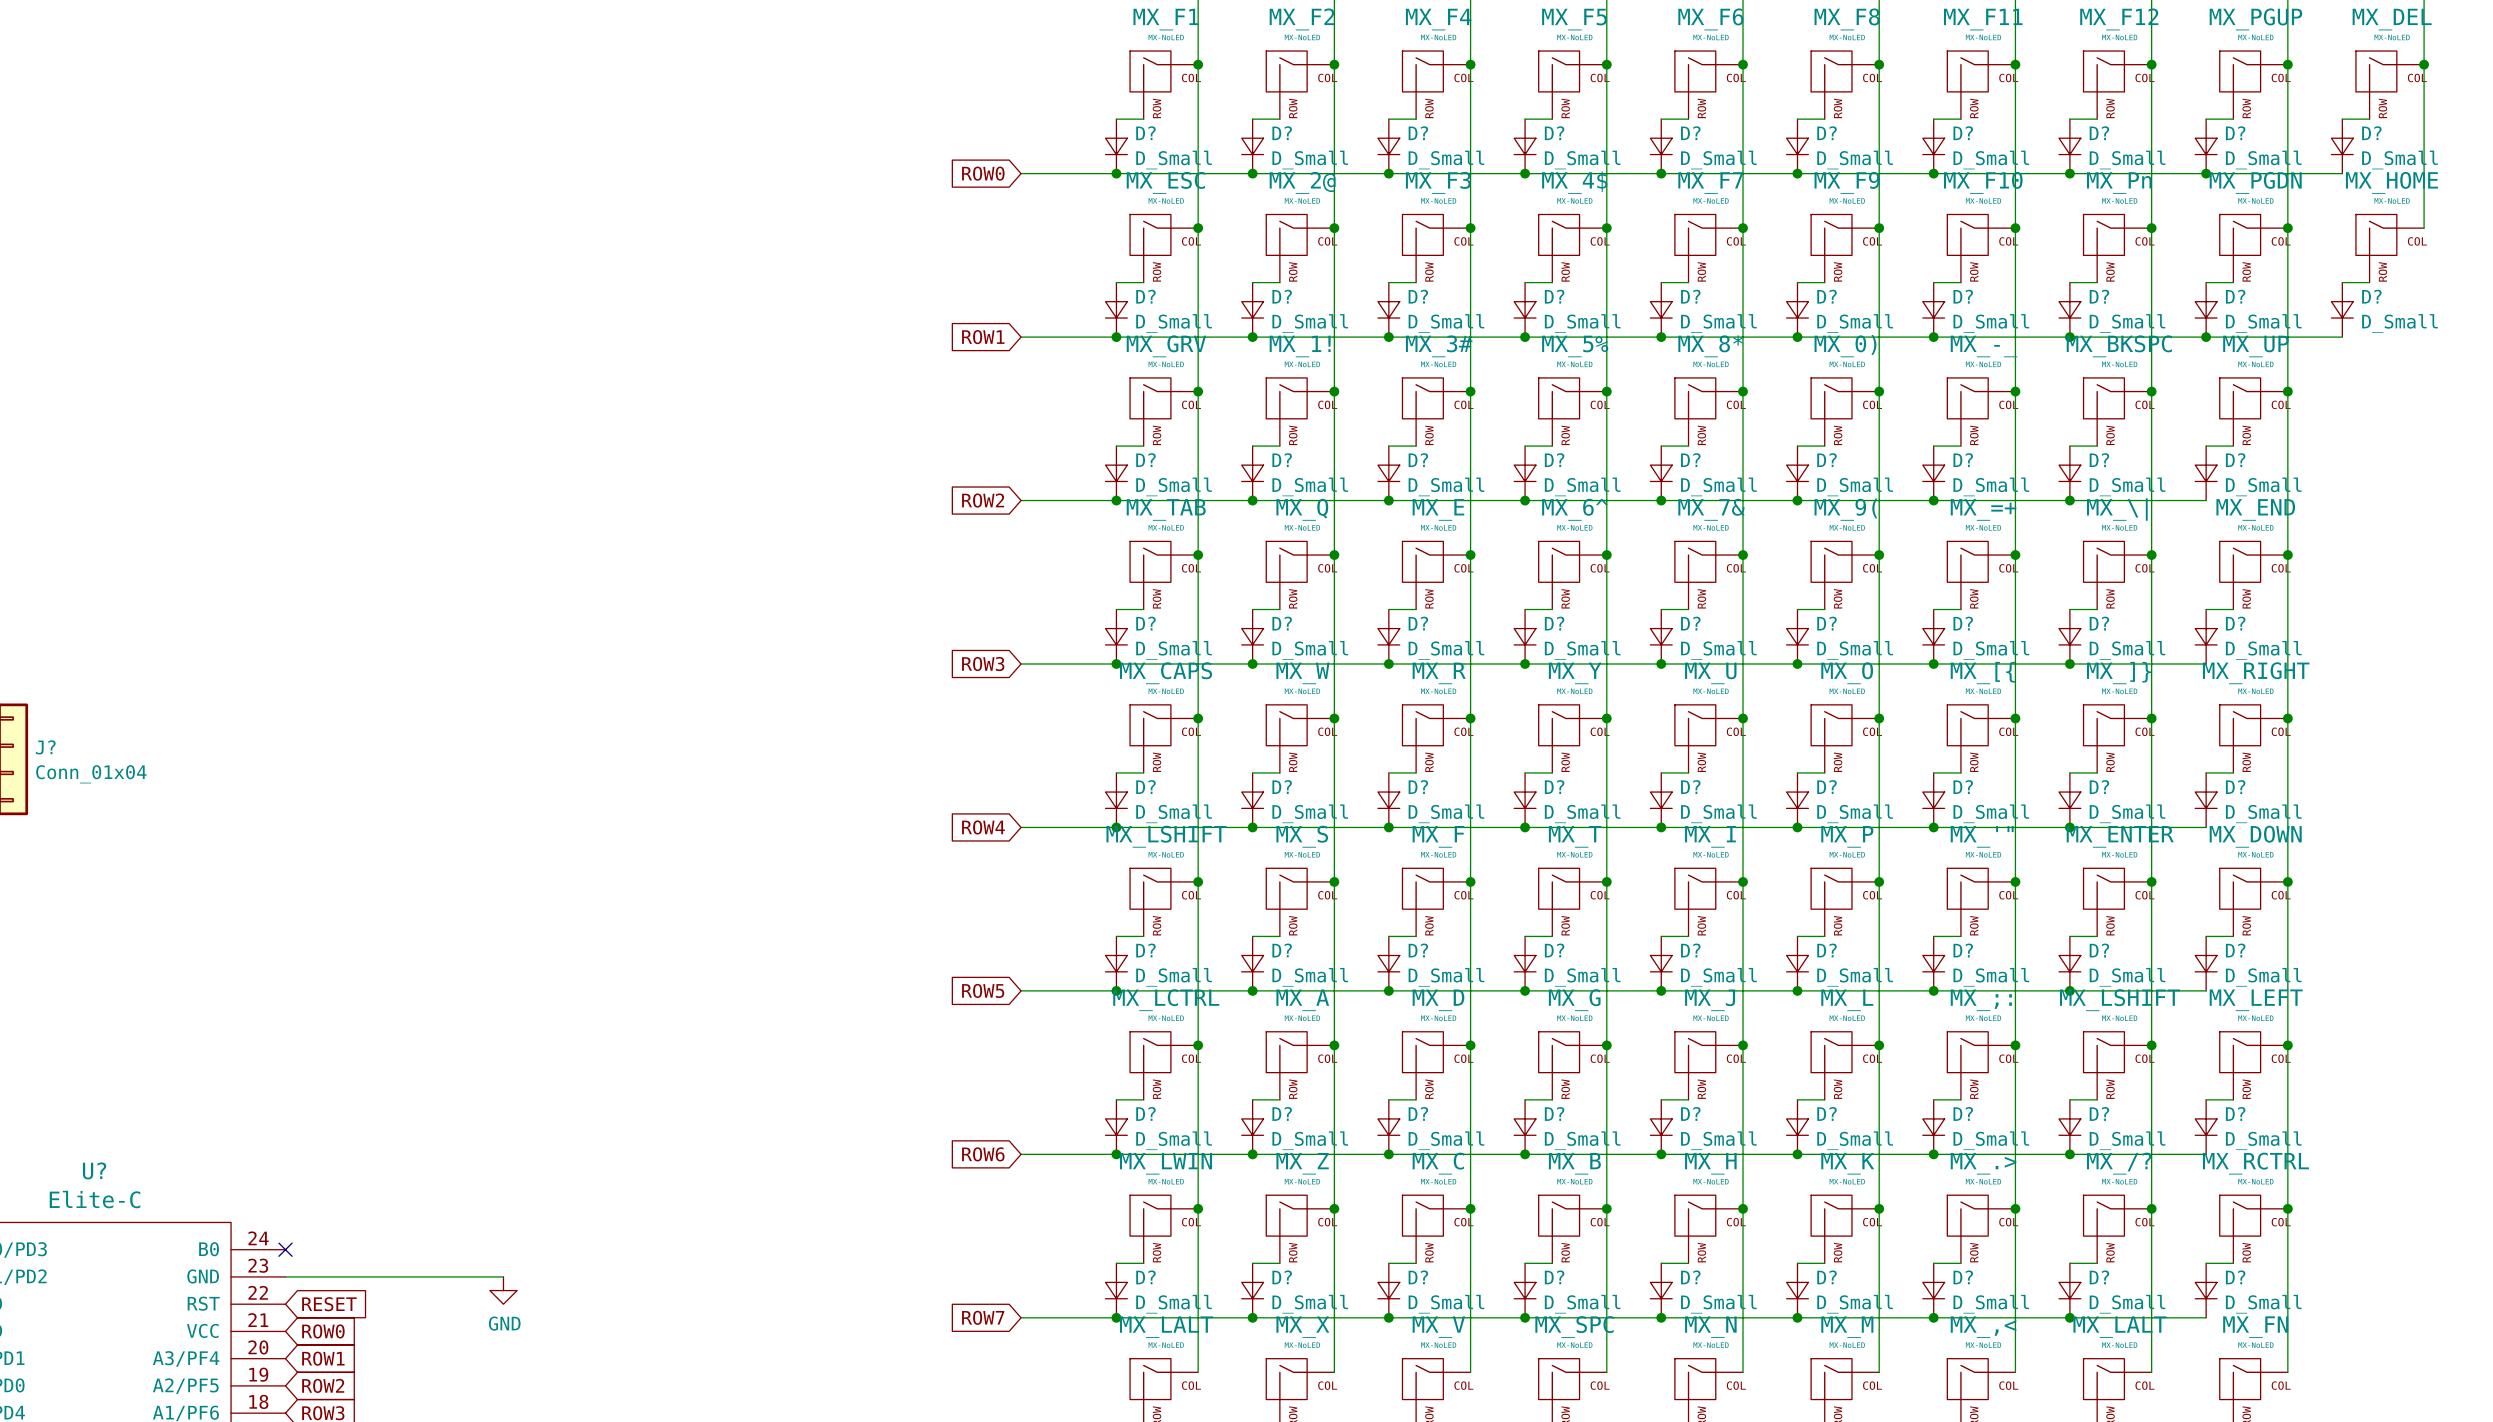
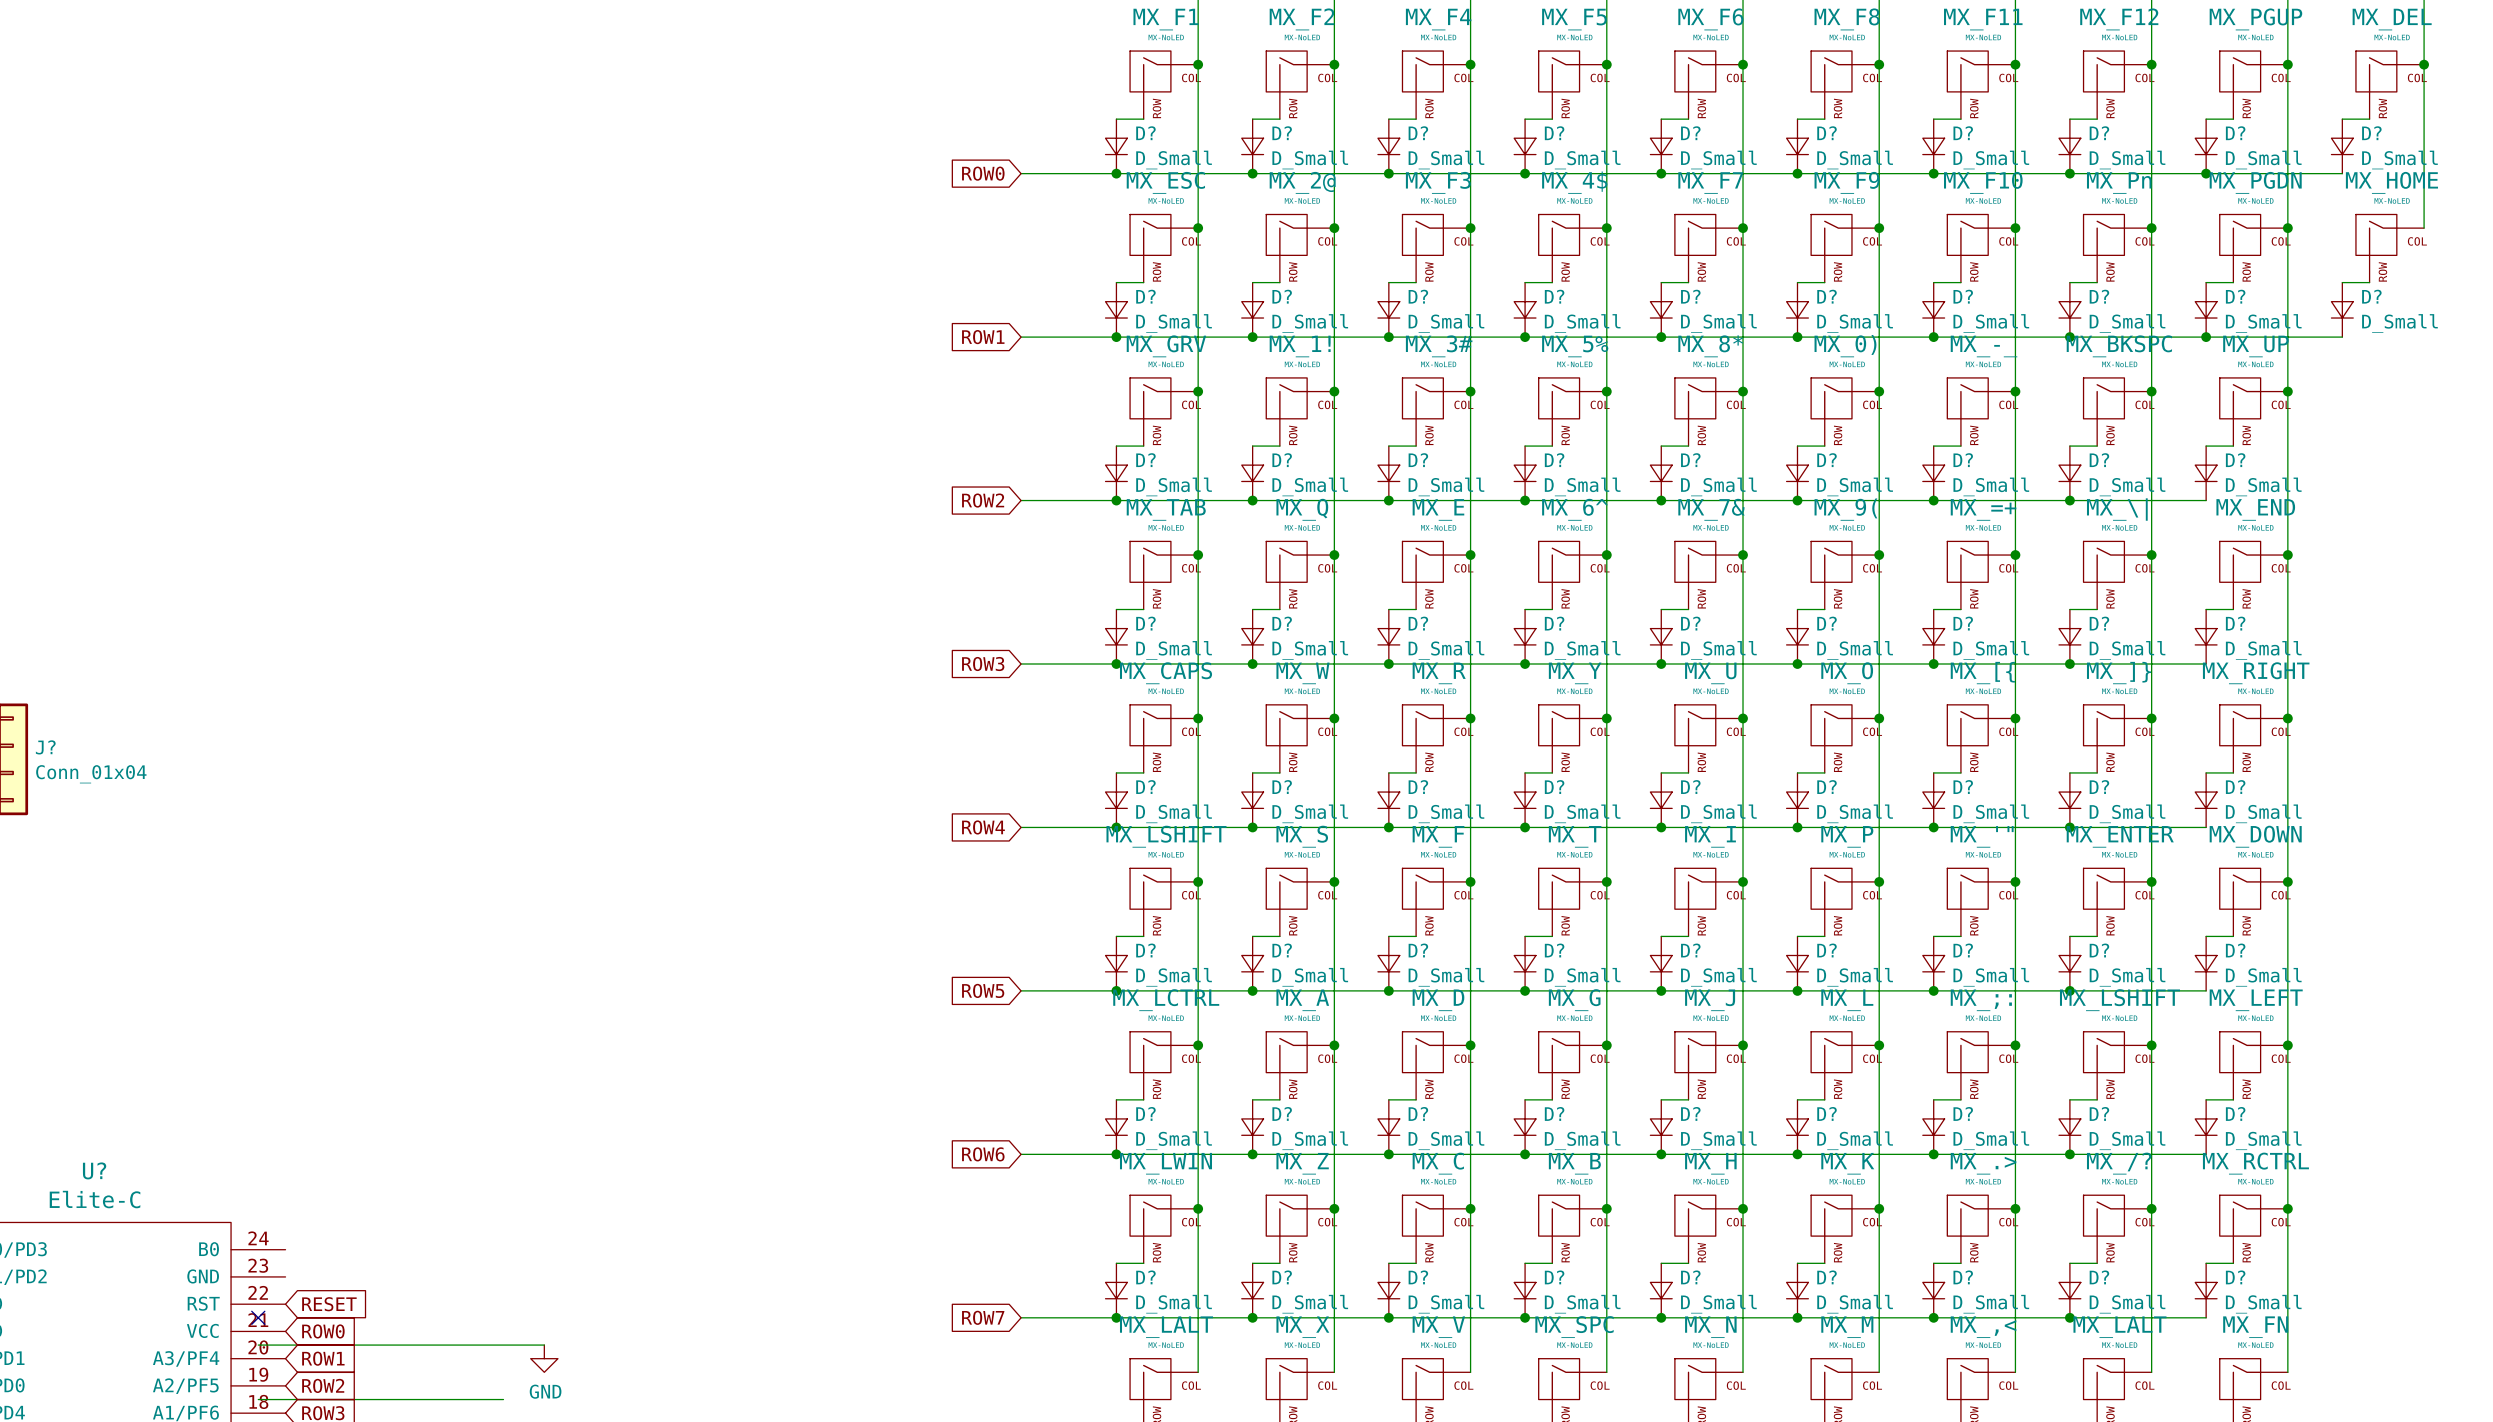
no-connect mark: (285, 1249) -> none
wire: (285, 1276) (503, 1276) -> none
power symbol position: GND (503, 1290) -> GND (544, 1358)
no-connect mark: none -> (258, 1317)
wire: none -> (258, 1345) (544, 1345)
wire: none -> (258, 1399) (503, 1399)

